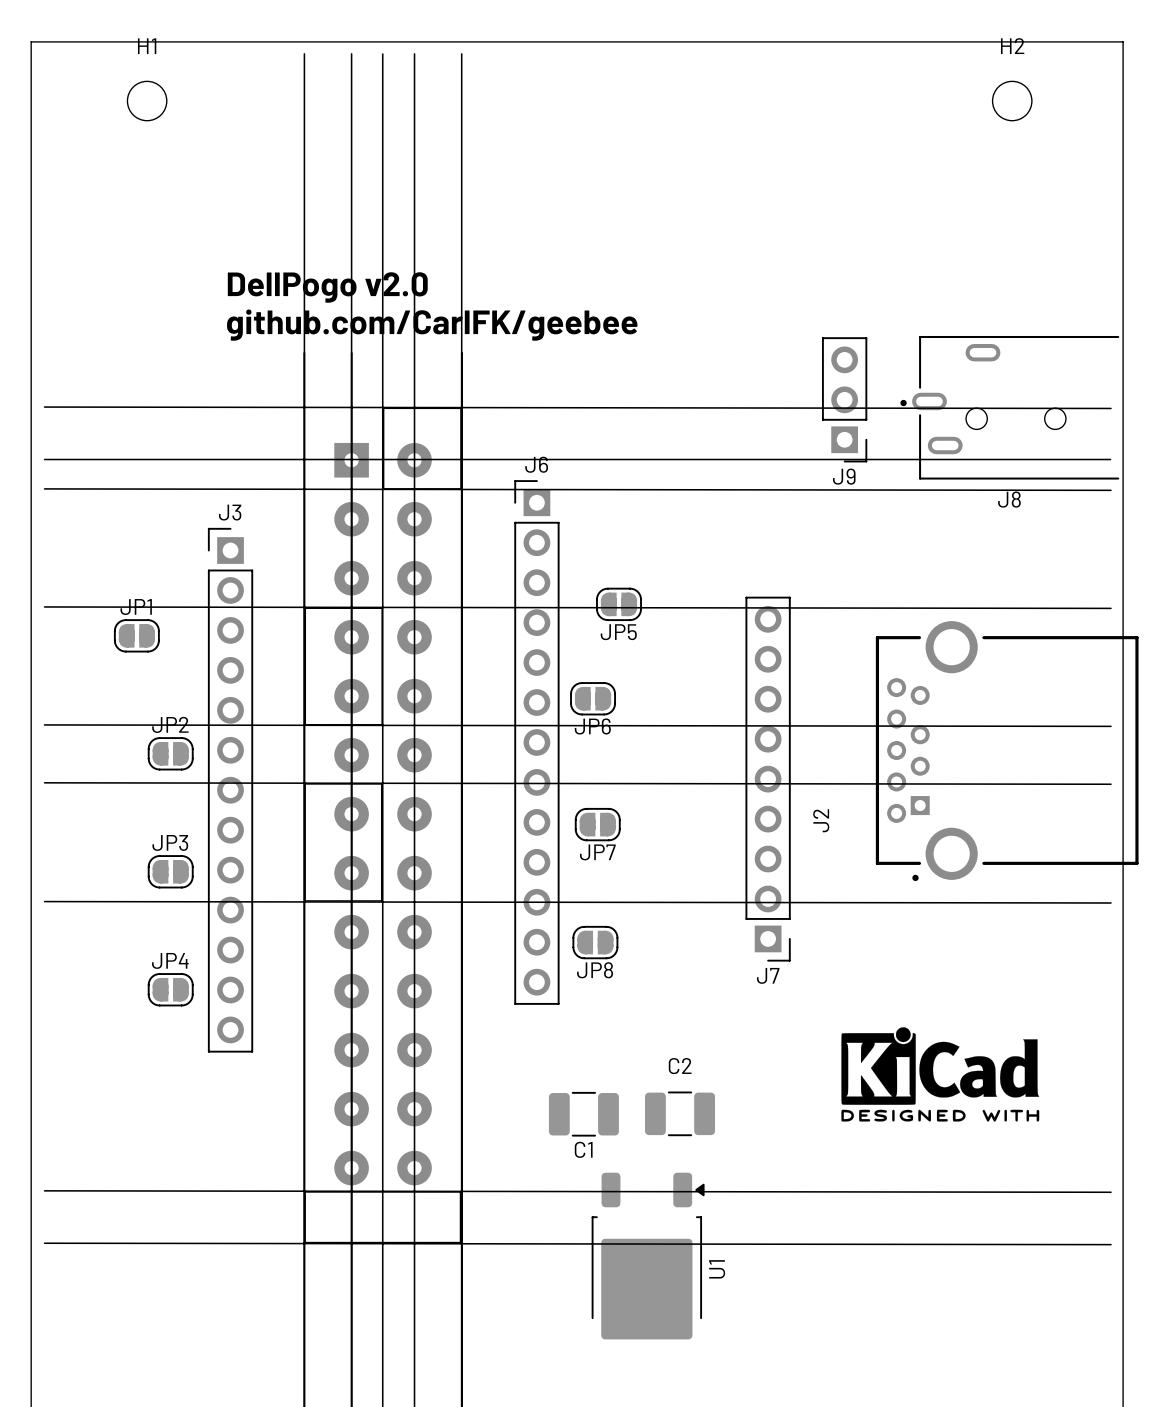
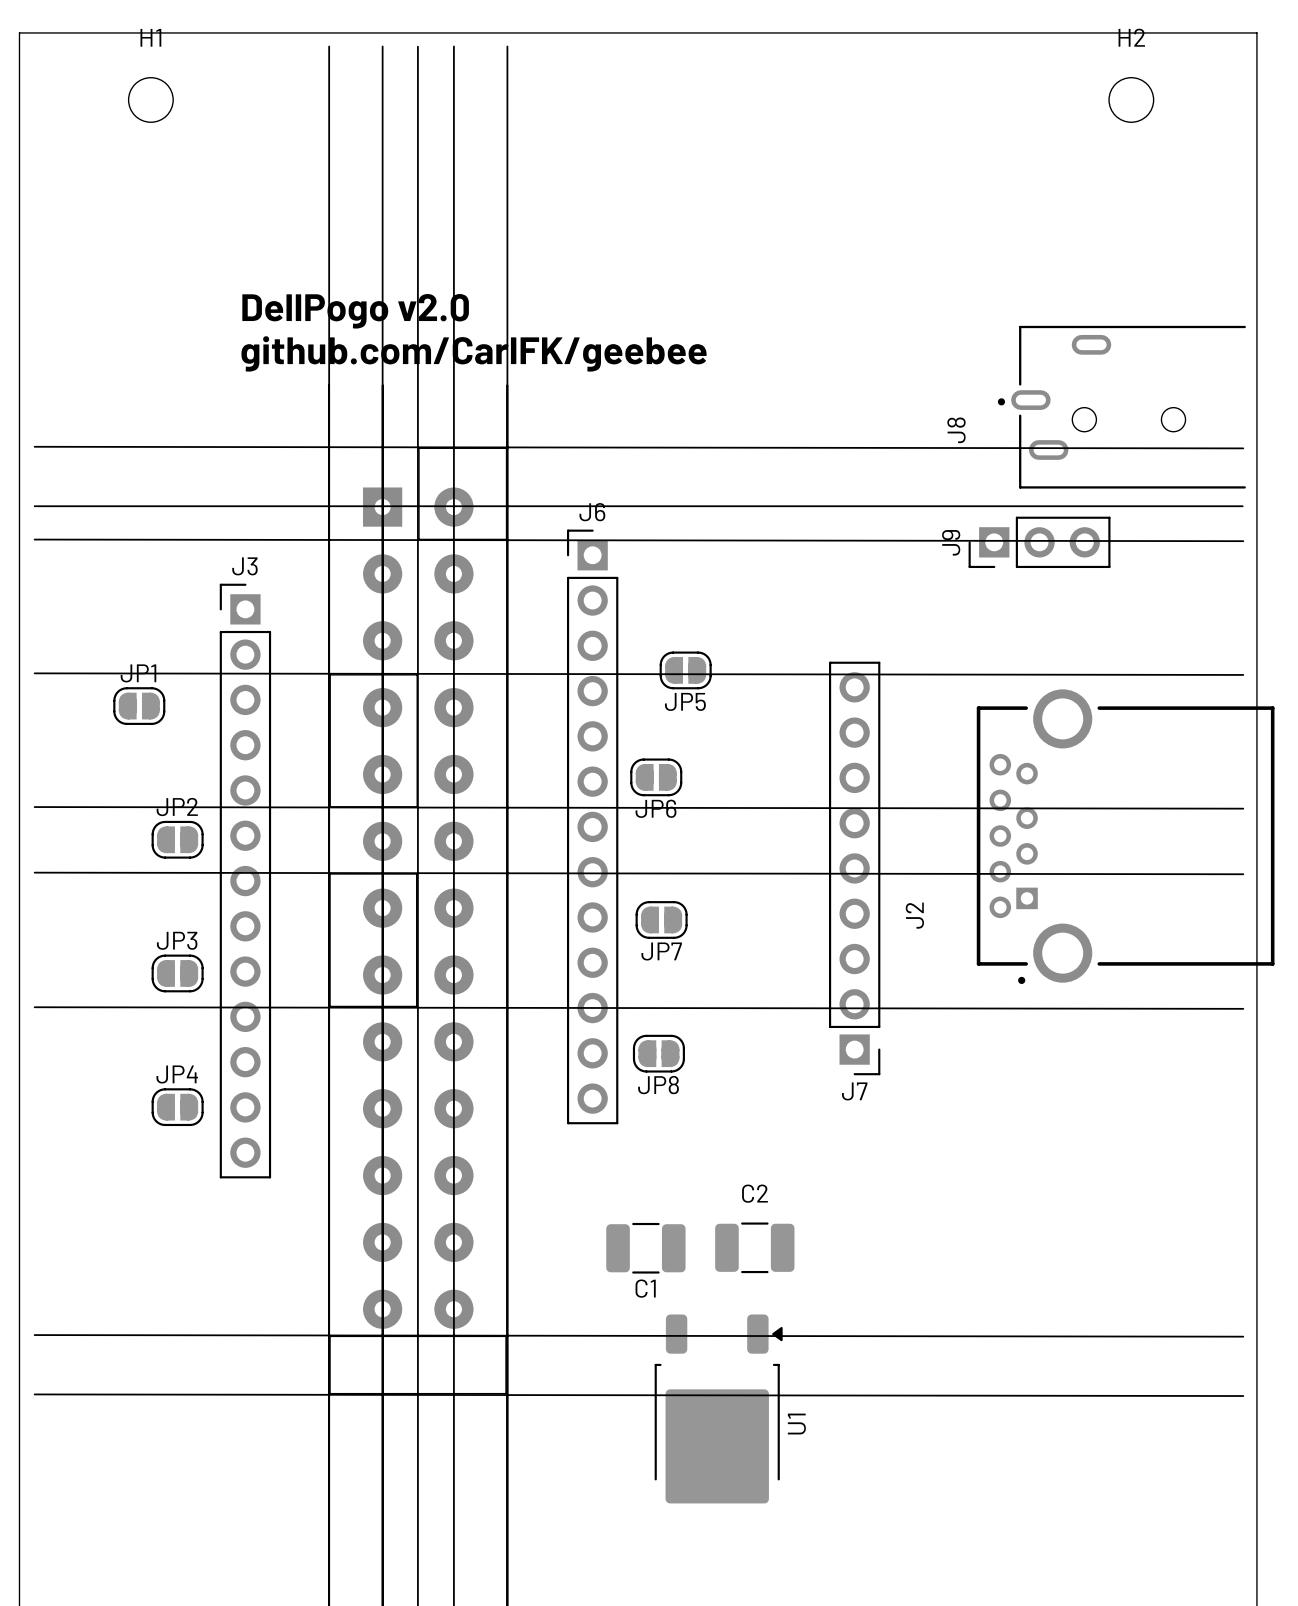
J9 rotation: 0° (844, 399) -> 90° clockwise (1039, 542)
J9 position: (844, 399) -> (1039, 542)
J8 position: (1009, 407) -> (1121, 407)
J8 name rotation: 0° (1009, 499) -> 90° counterclockwise (956, 430)
J8 name position: J8 (1009, 499) -> J8 (956, 430)
drawing: [841, 1027, 1040, 1122] -> none

